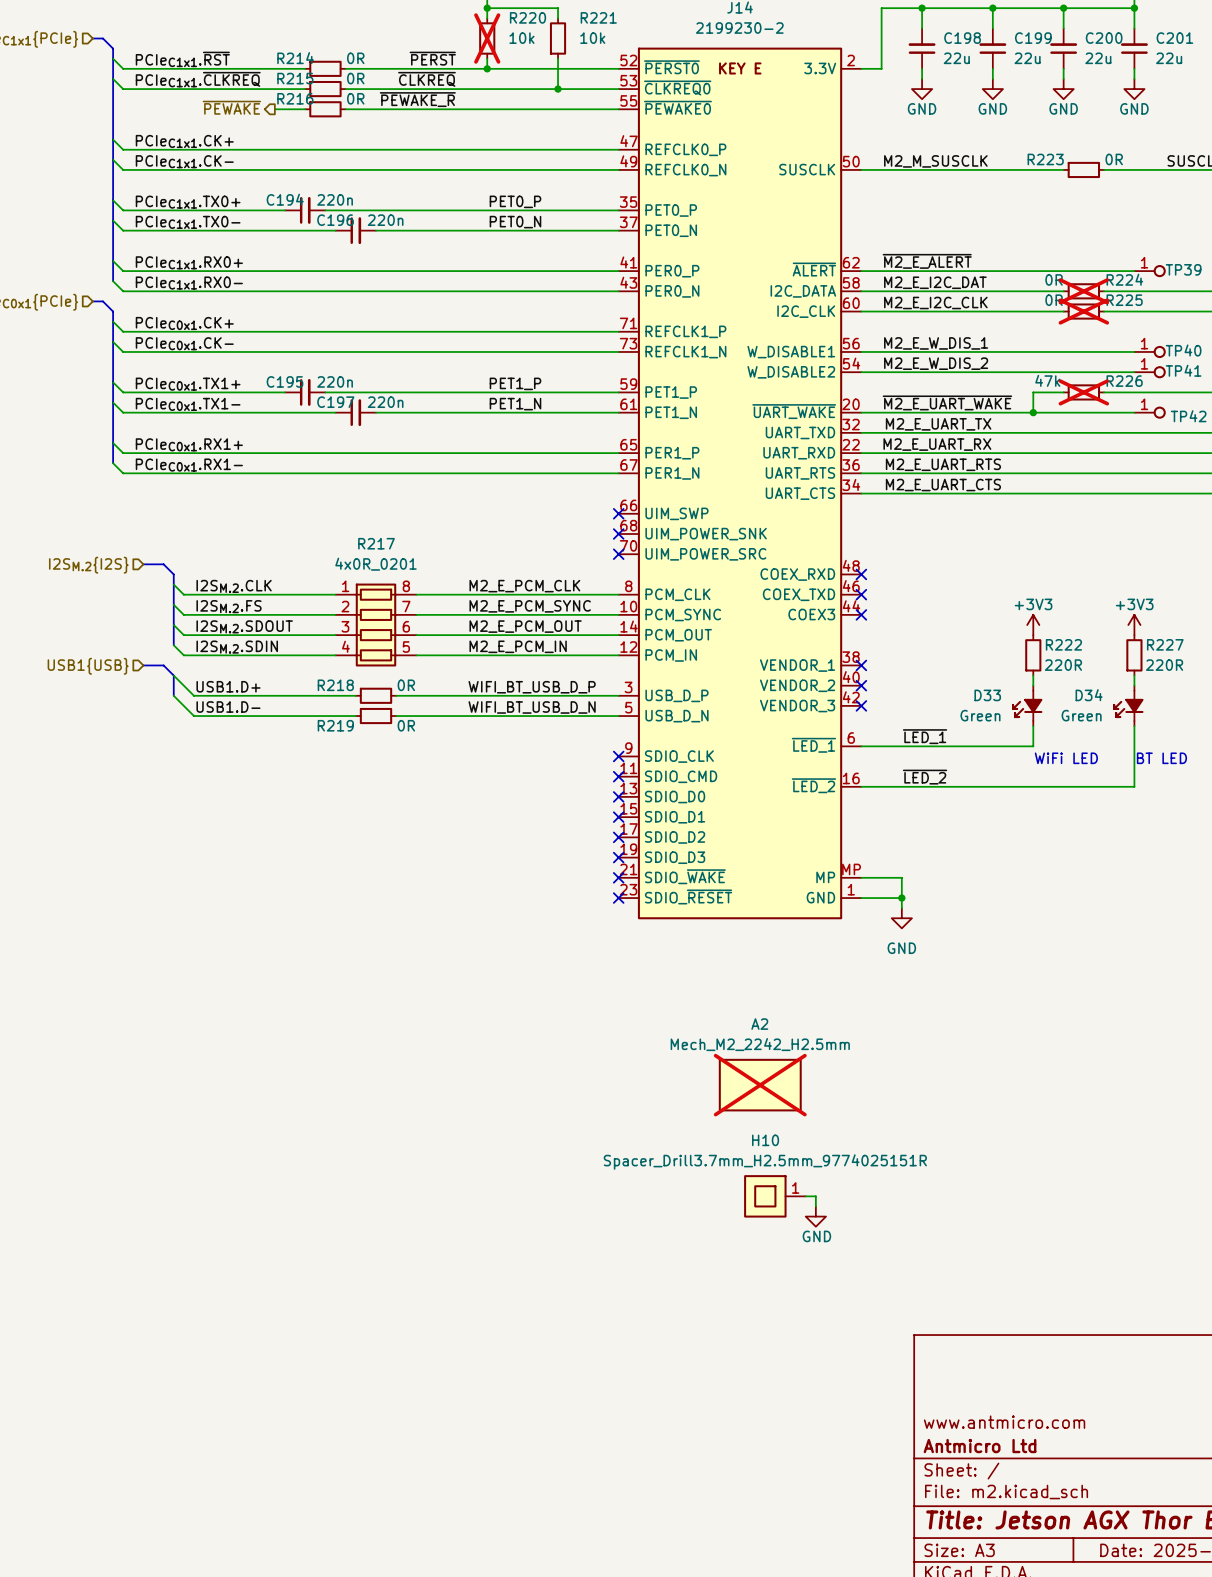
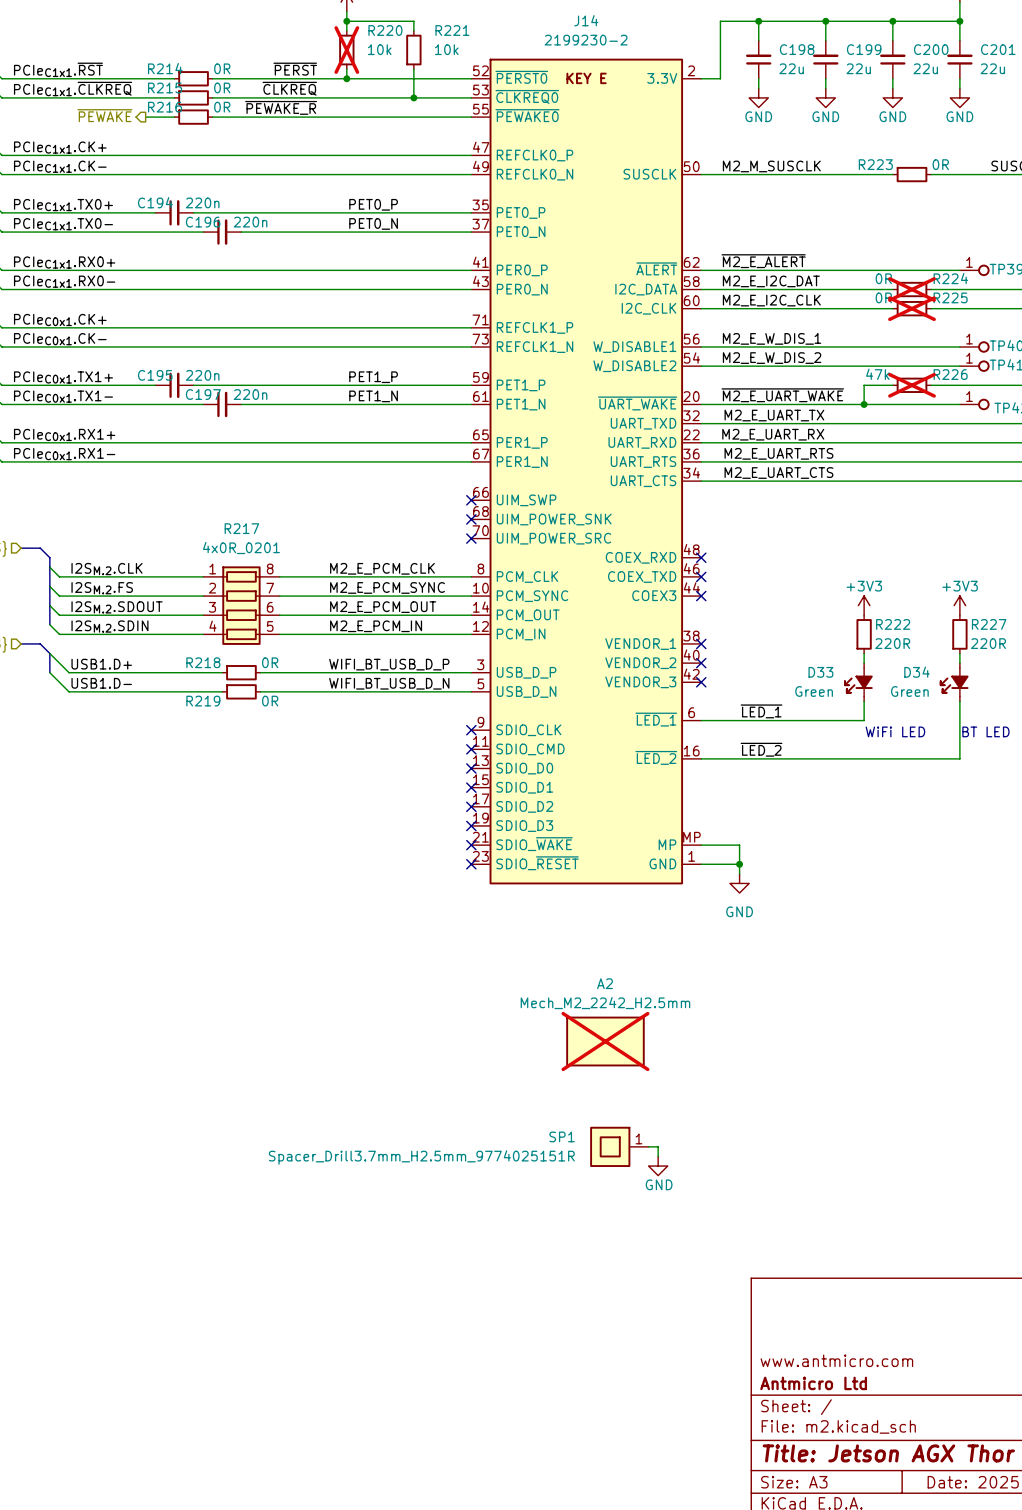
H10 name: H10 (765, 1140) -> SP1 (562, 1136)
H10 value position: Spacer_Drill3.7mm_H2.5mm_9774025151R (765, 1162) -> Spacer_Drill3.7mm_H2.5mm_9774025151R (421, 1157)

